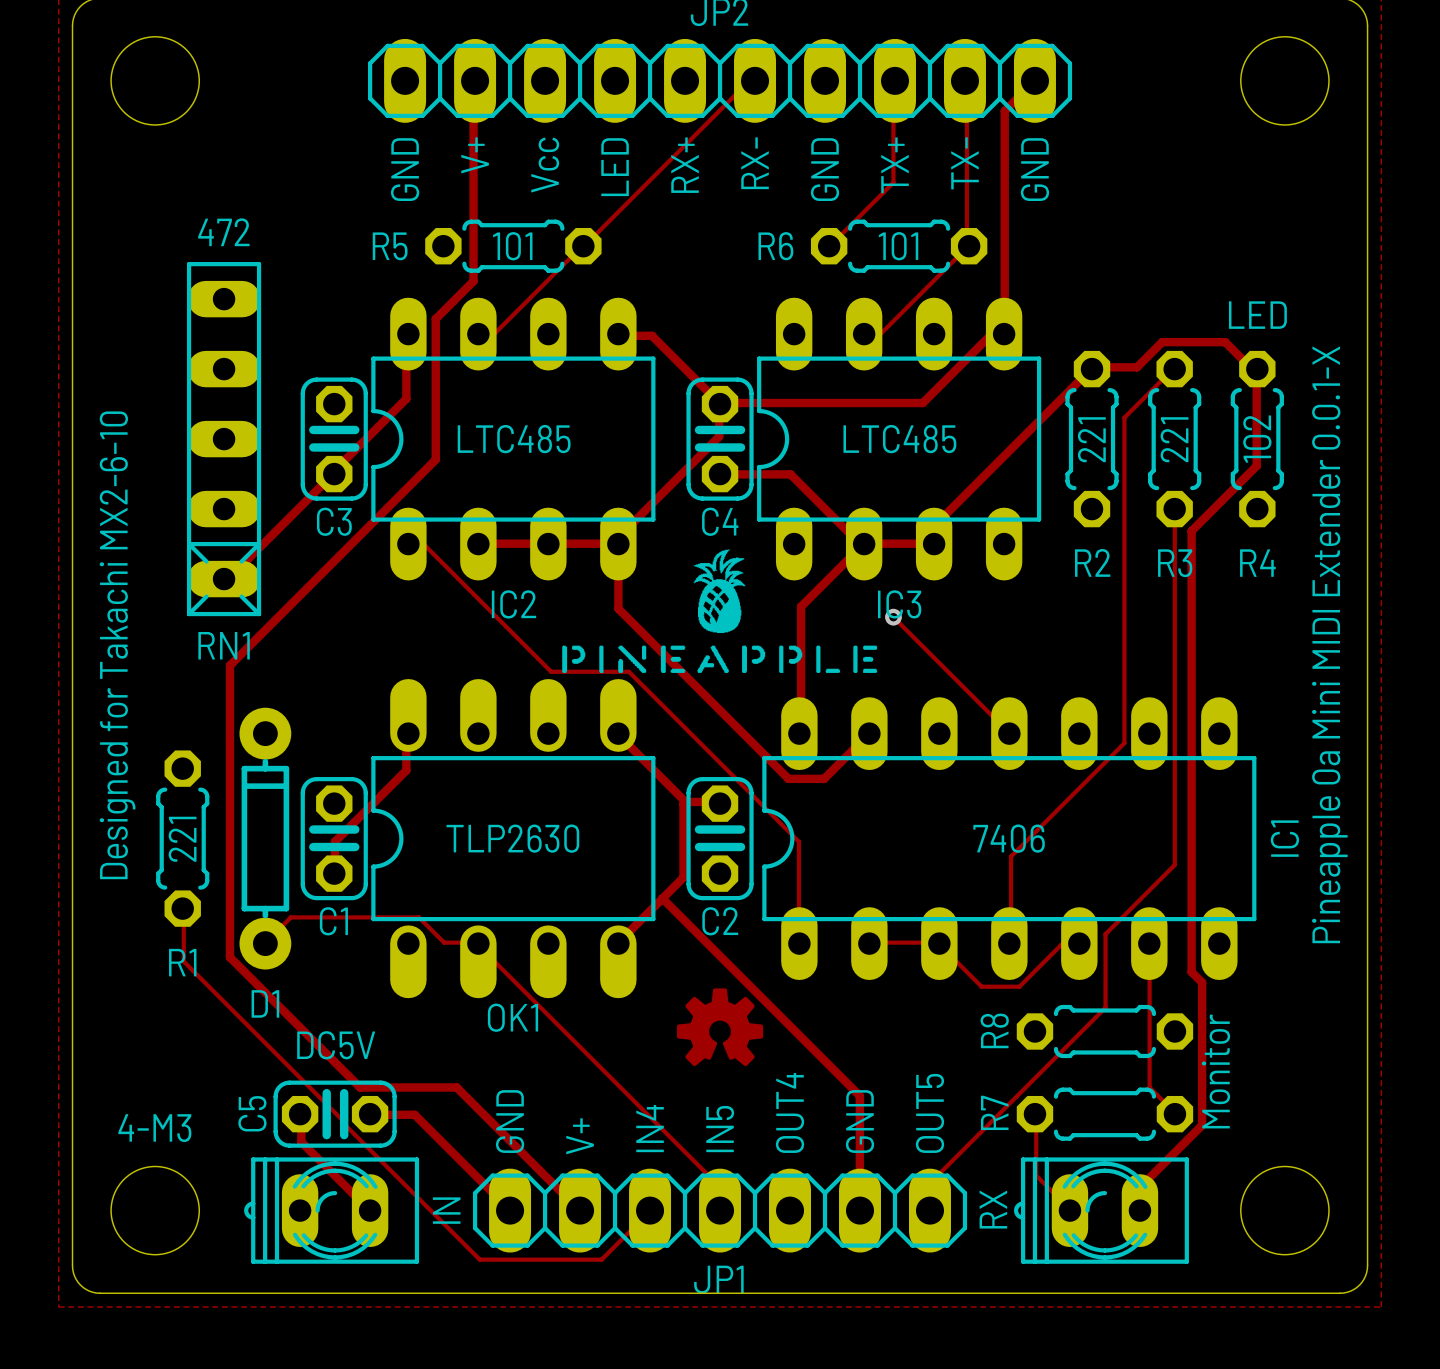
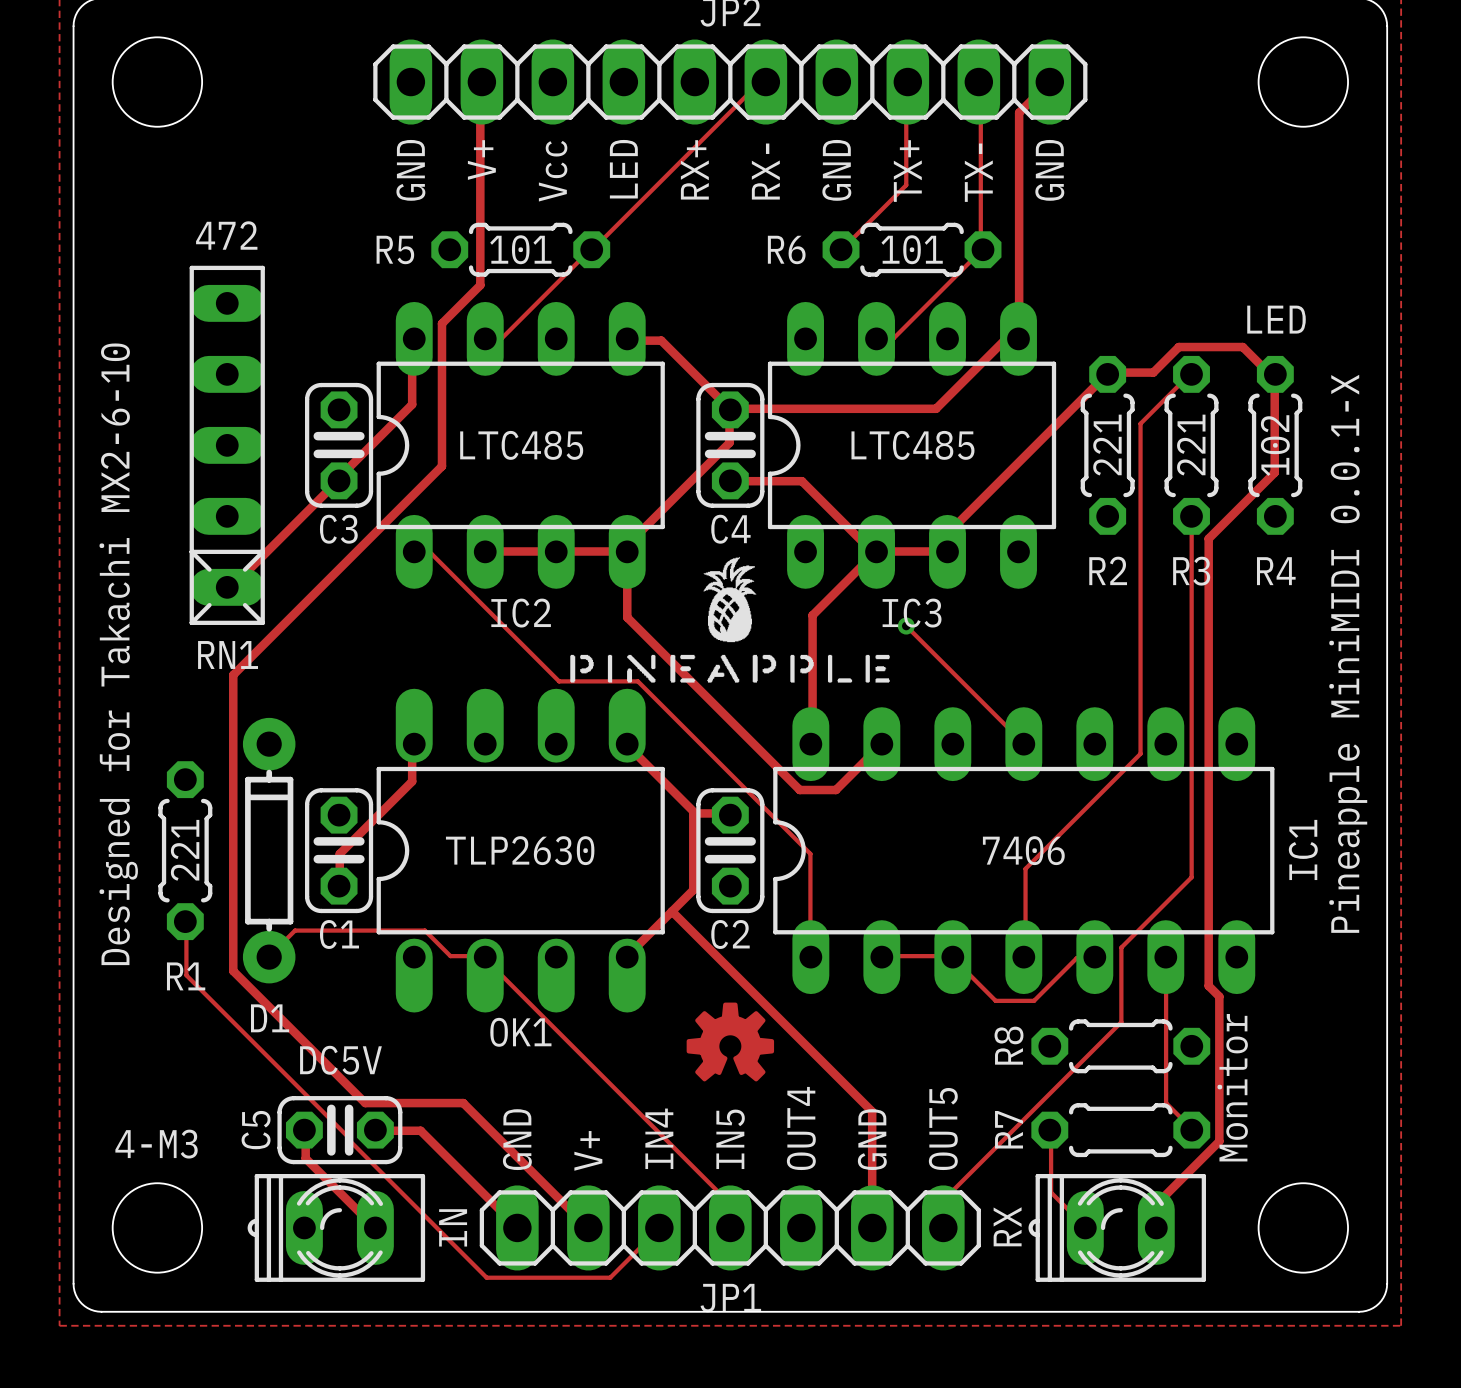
text: Pineapple 0a Mini MIDI Extender 0.0.1-X (1329, 644) -> Pineapple MiniMIDI 0.0.1-X (1348, 653)

